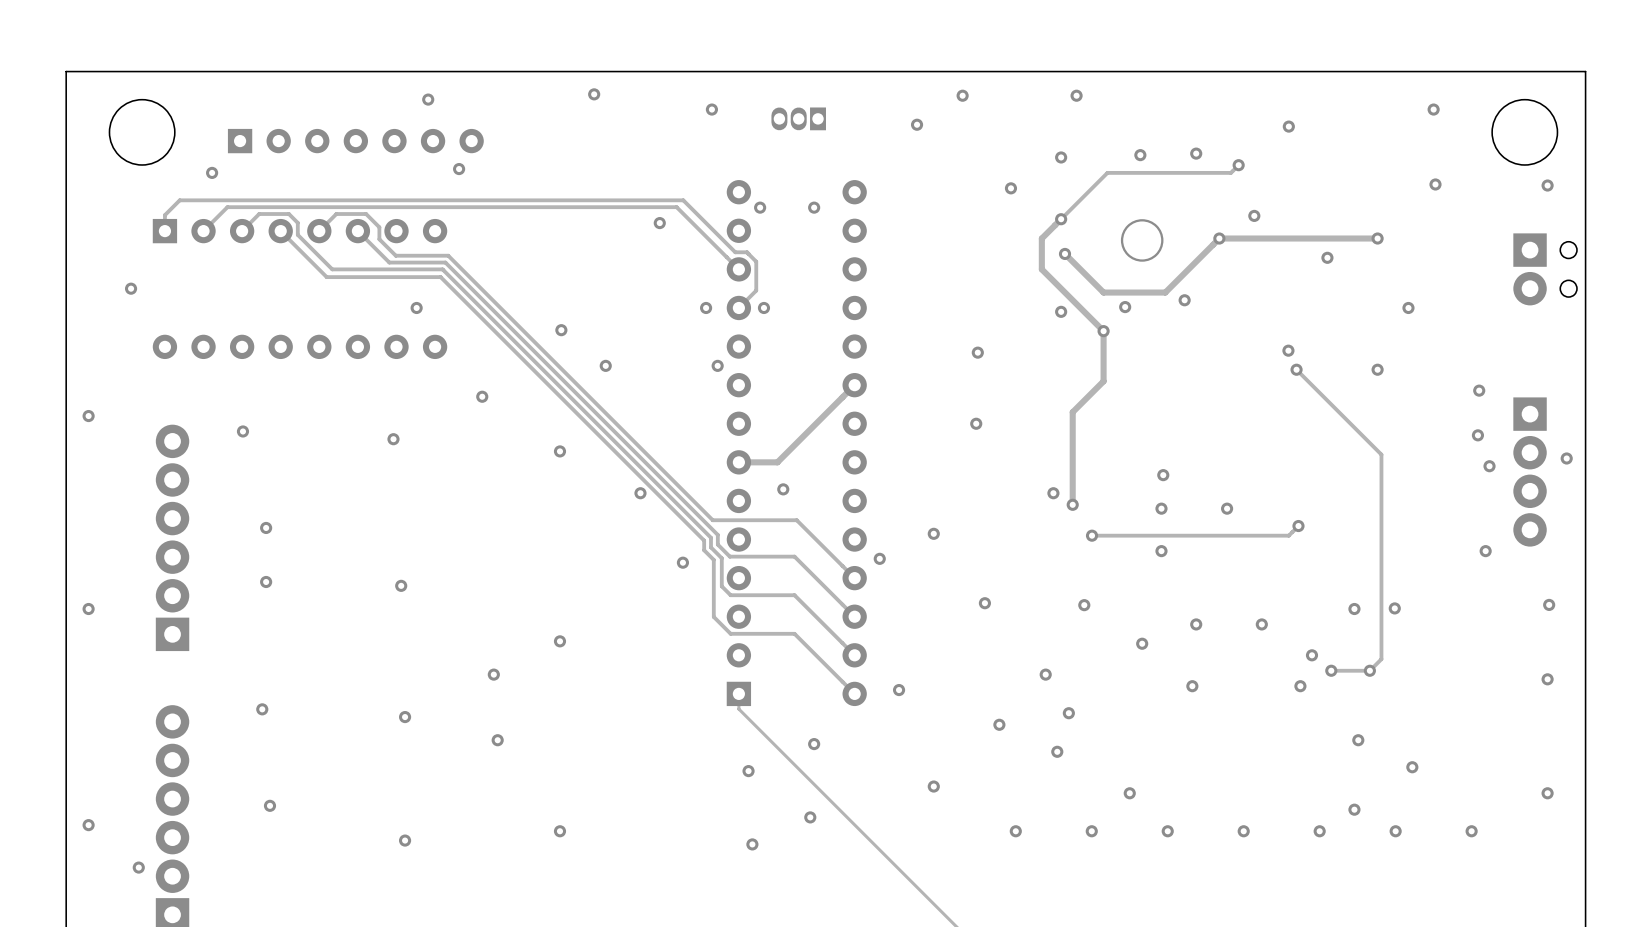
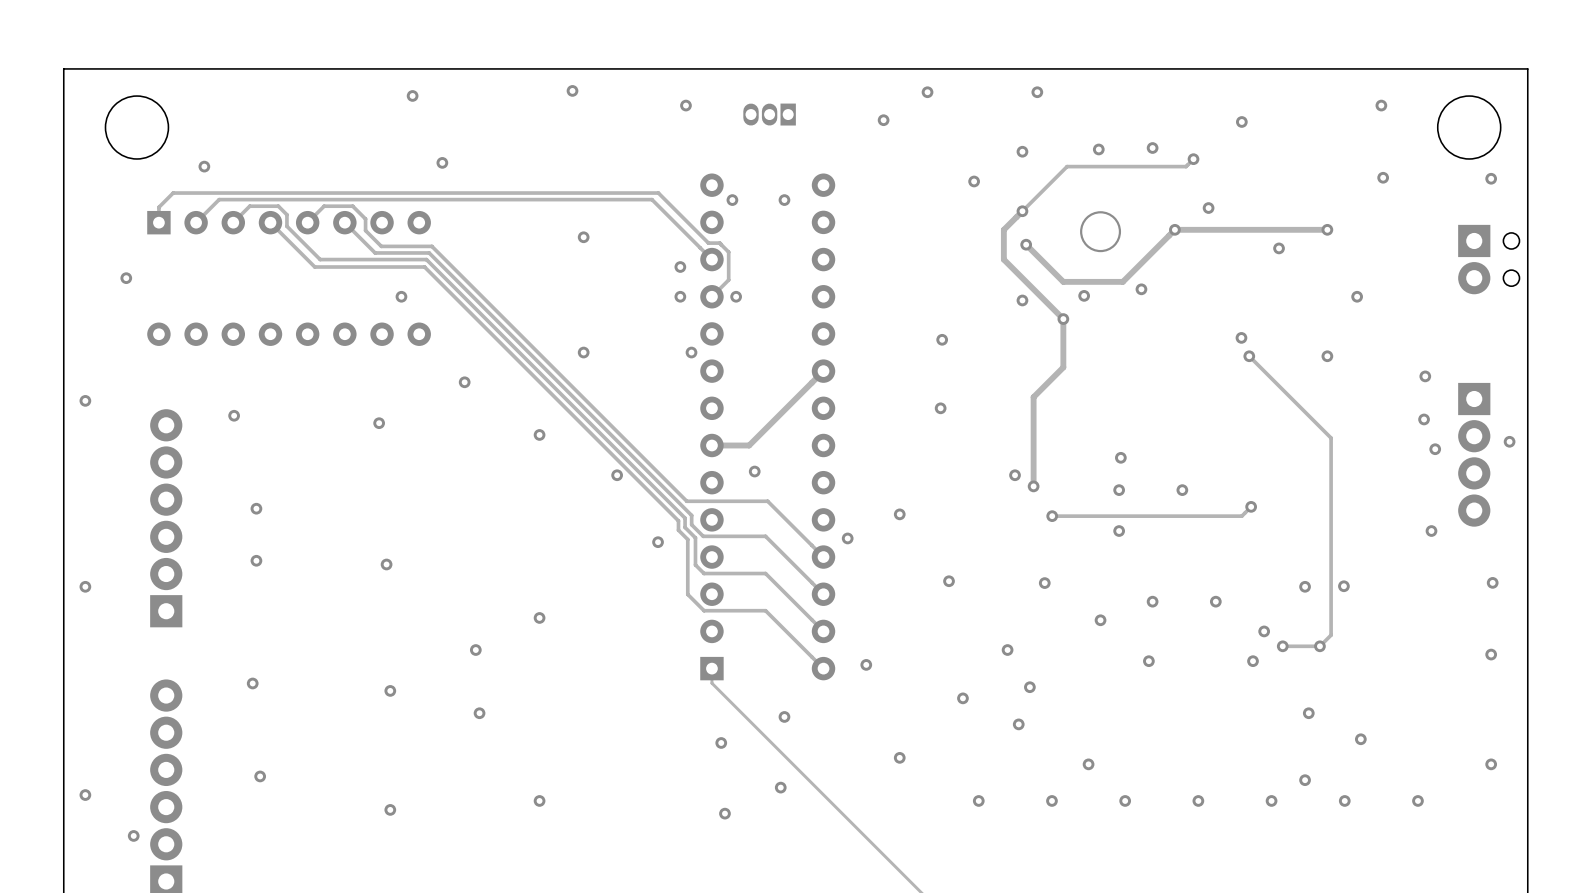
part: (355, 141) -> none
via: (659, 223) -> none
via: none -> (583, 237)
via: none -> (680, 267)
via: (561, 330) -> none

